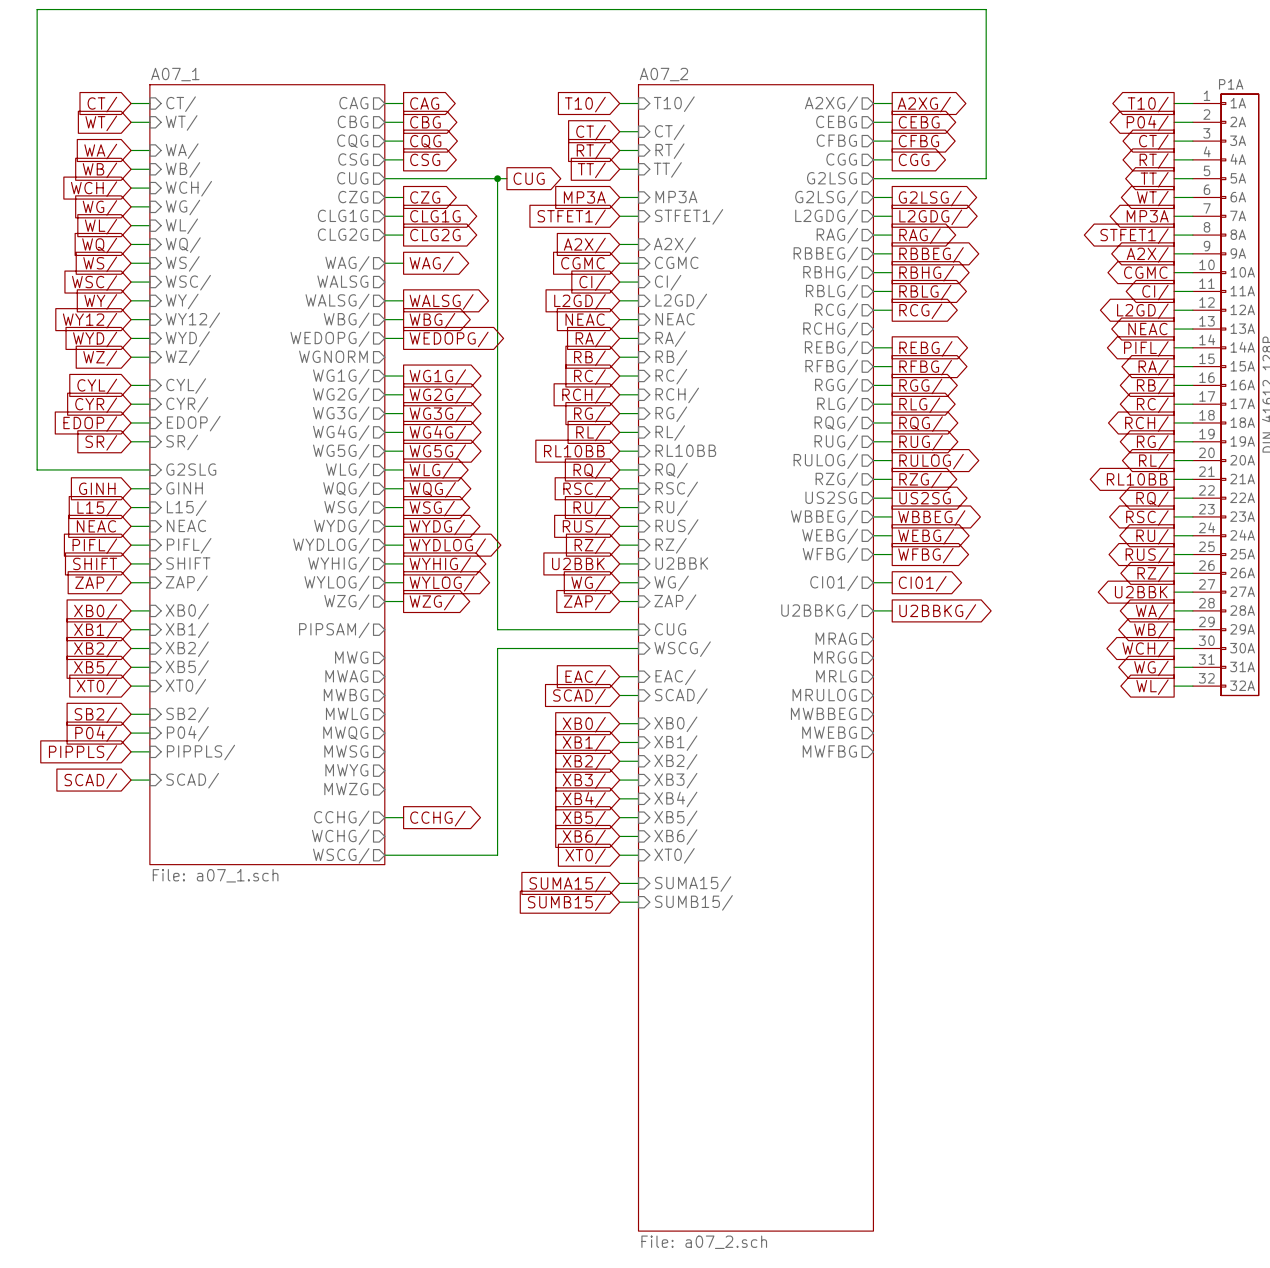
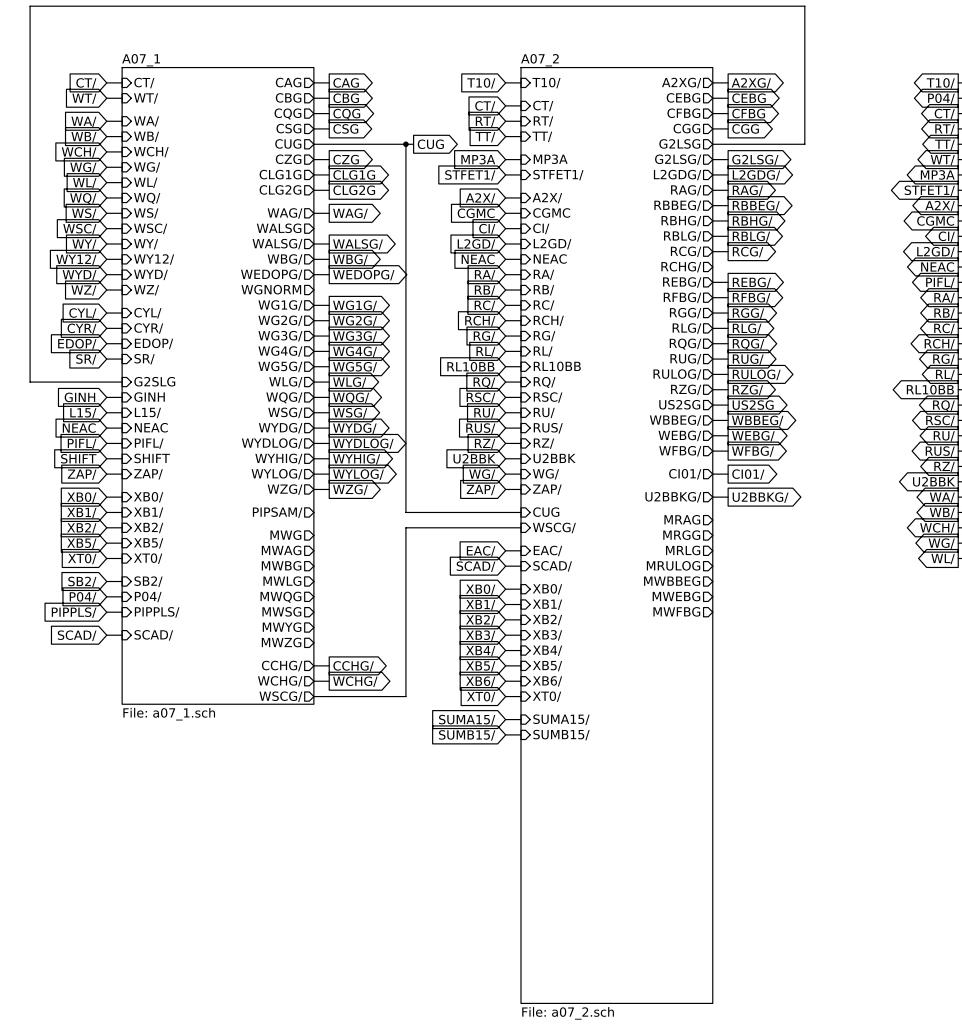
wire: none -> (313, 681) (329, 681)
global label: none -> WCHG/ (355, 681)

